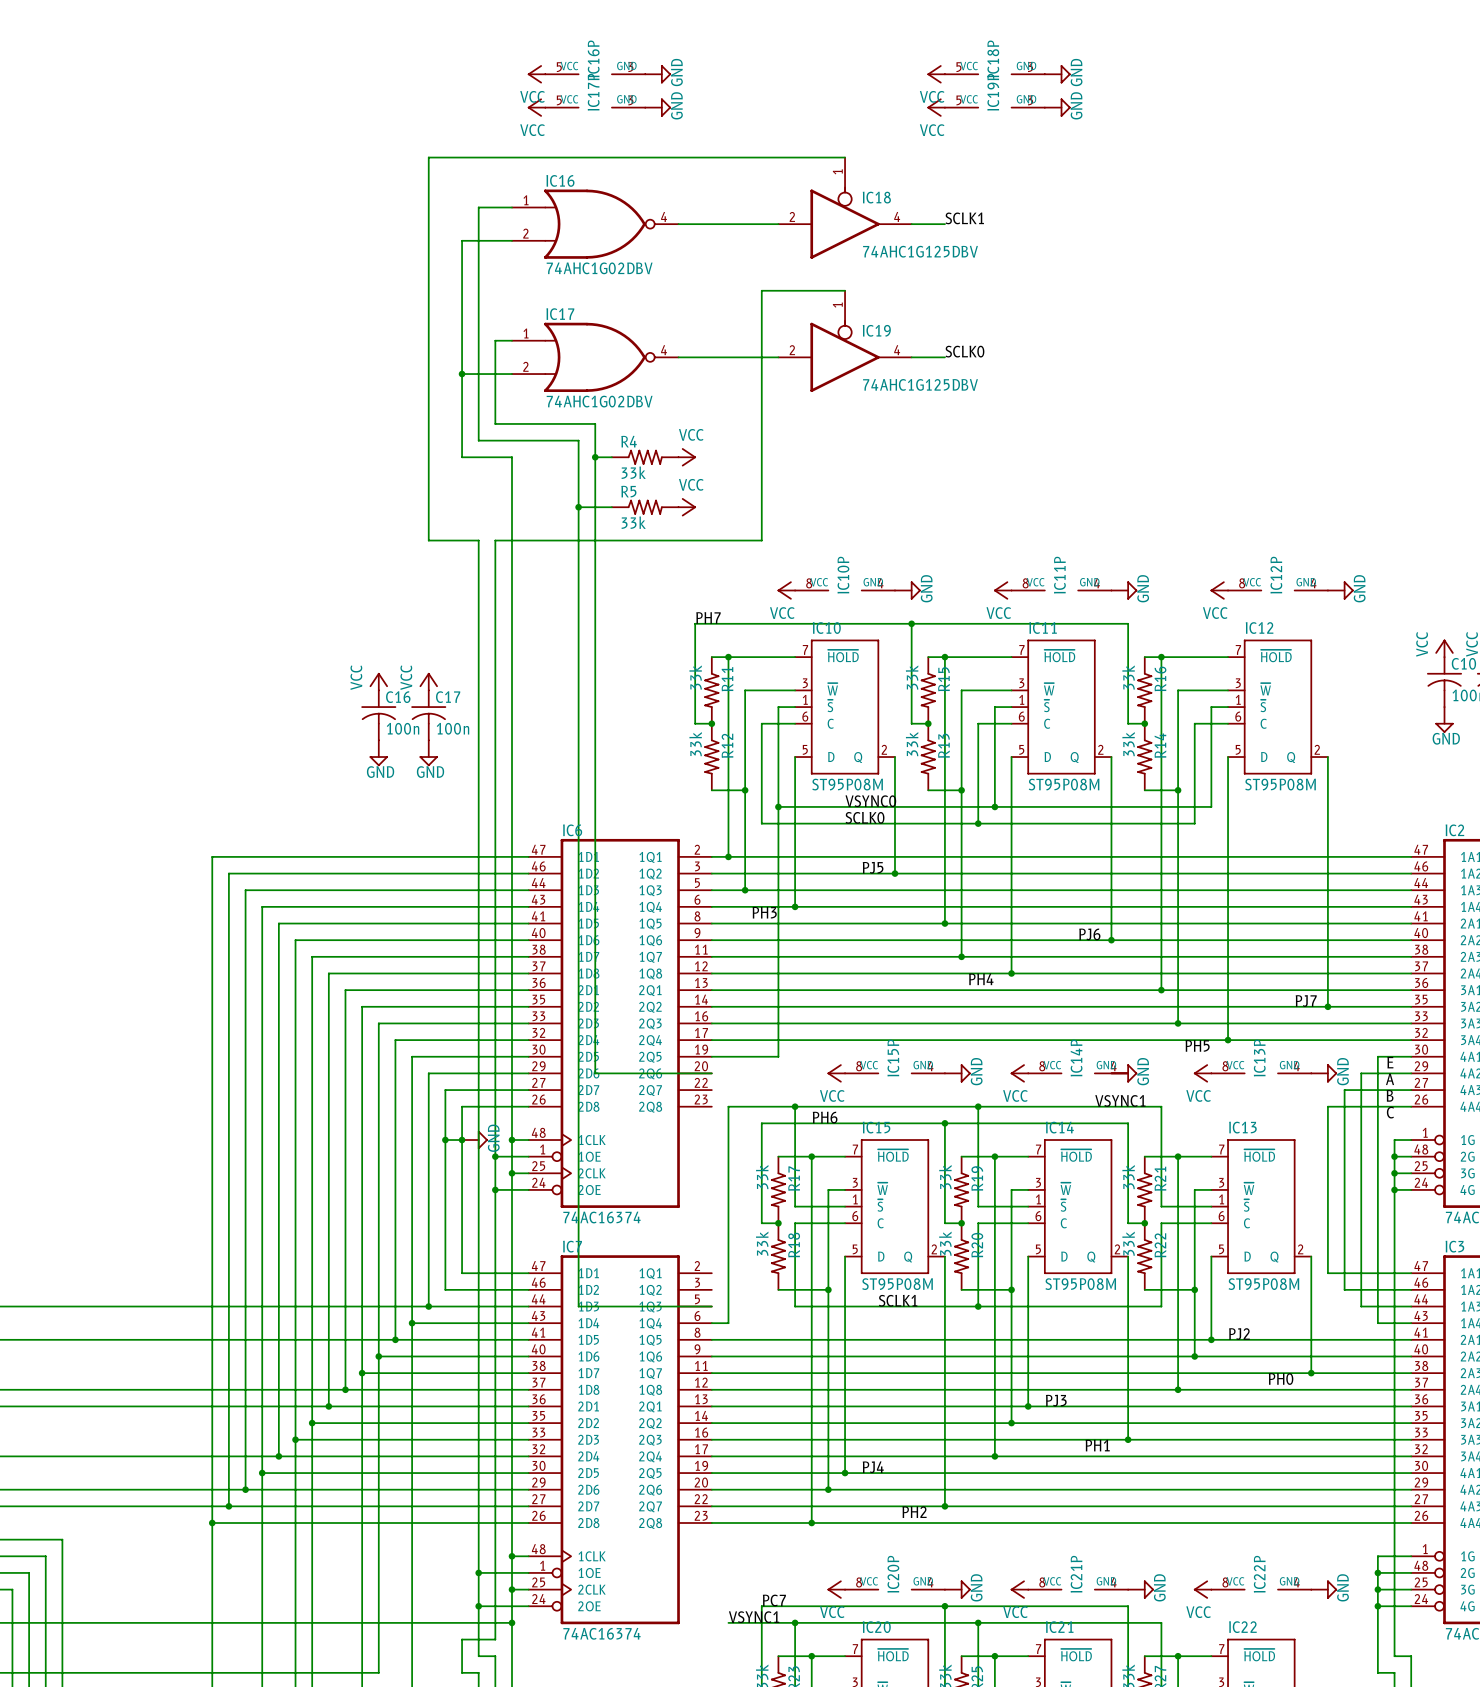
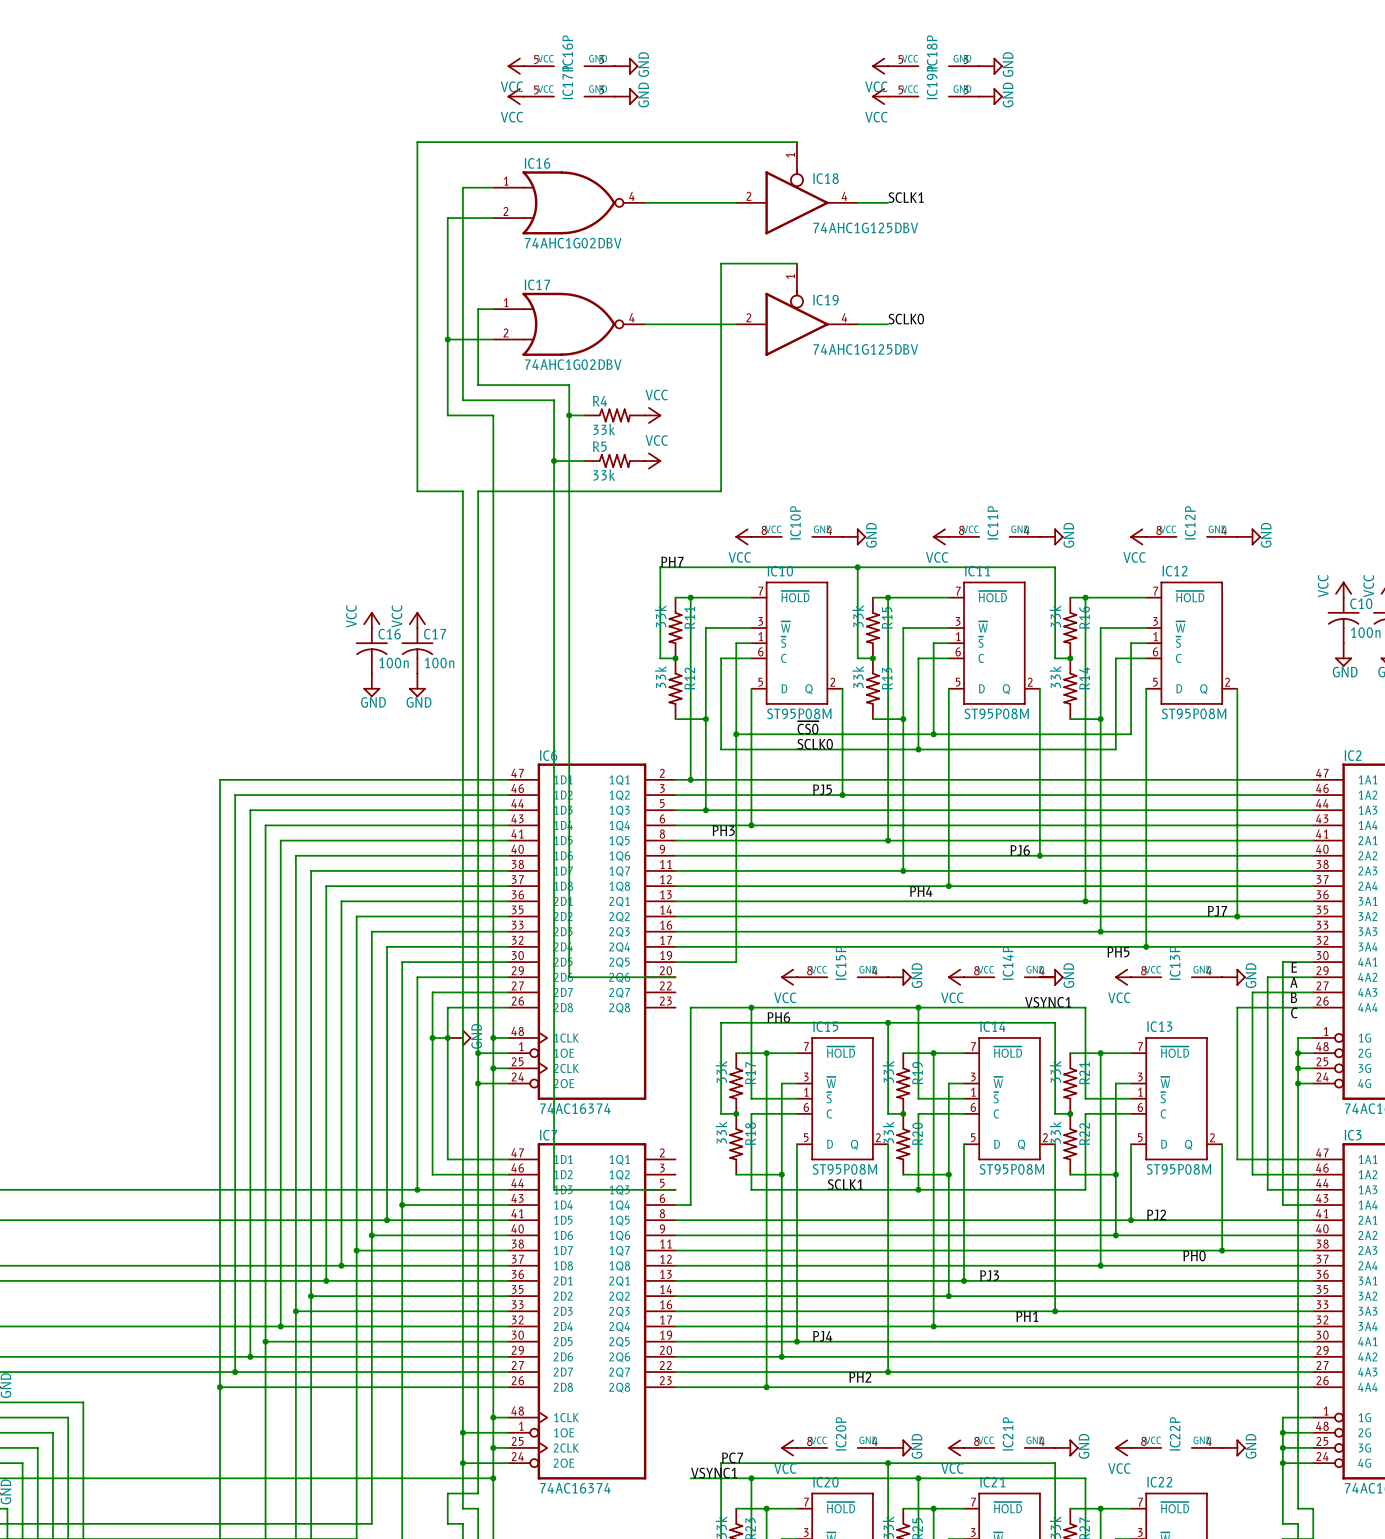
label: VSYNC0 (870, 801) -> ~{CS0} (808, 727)

